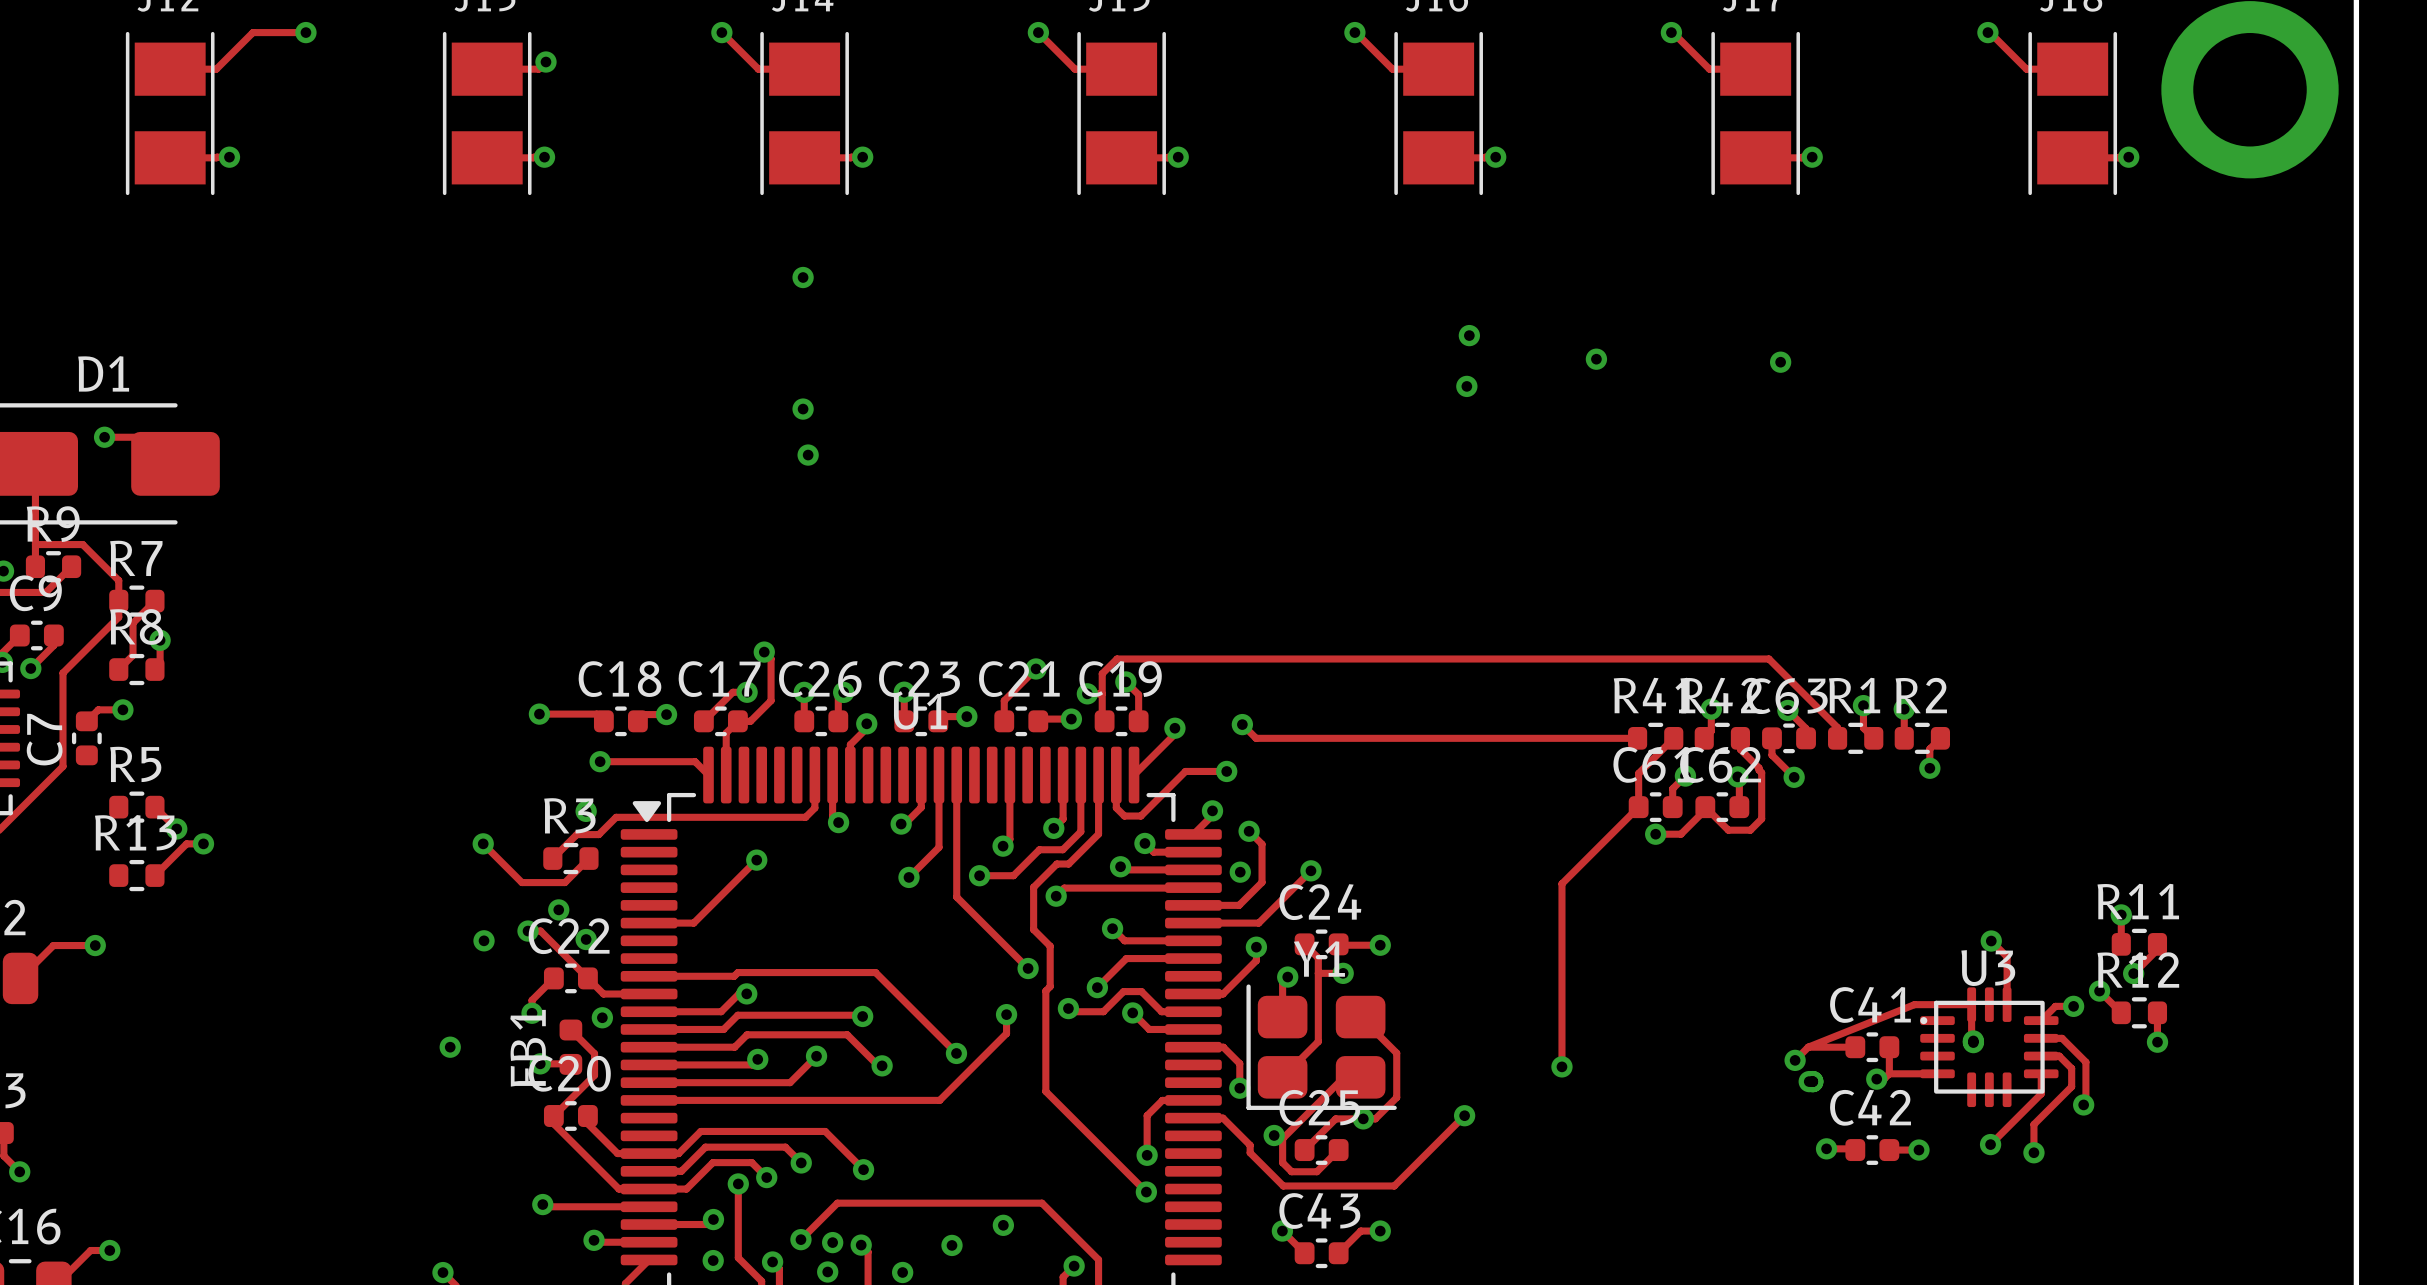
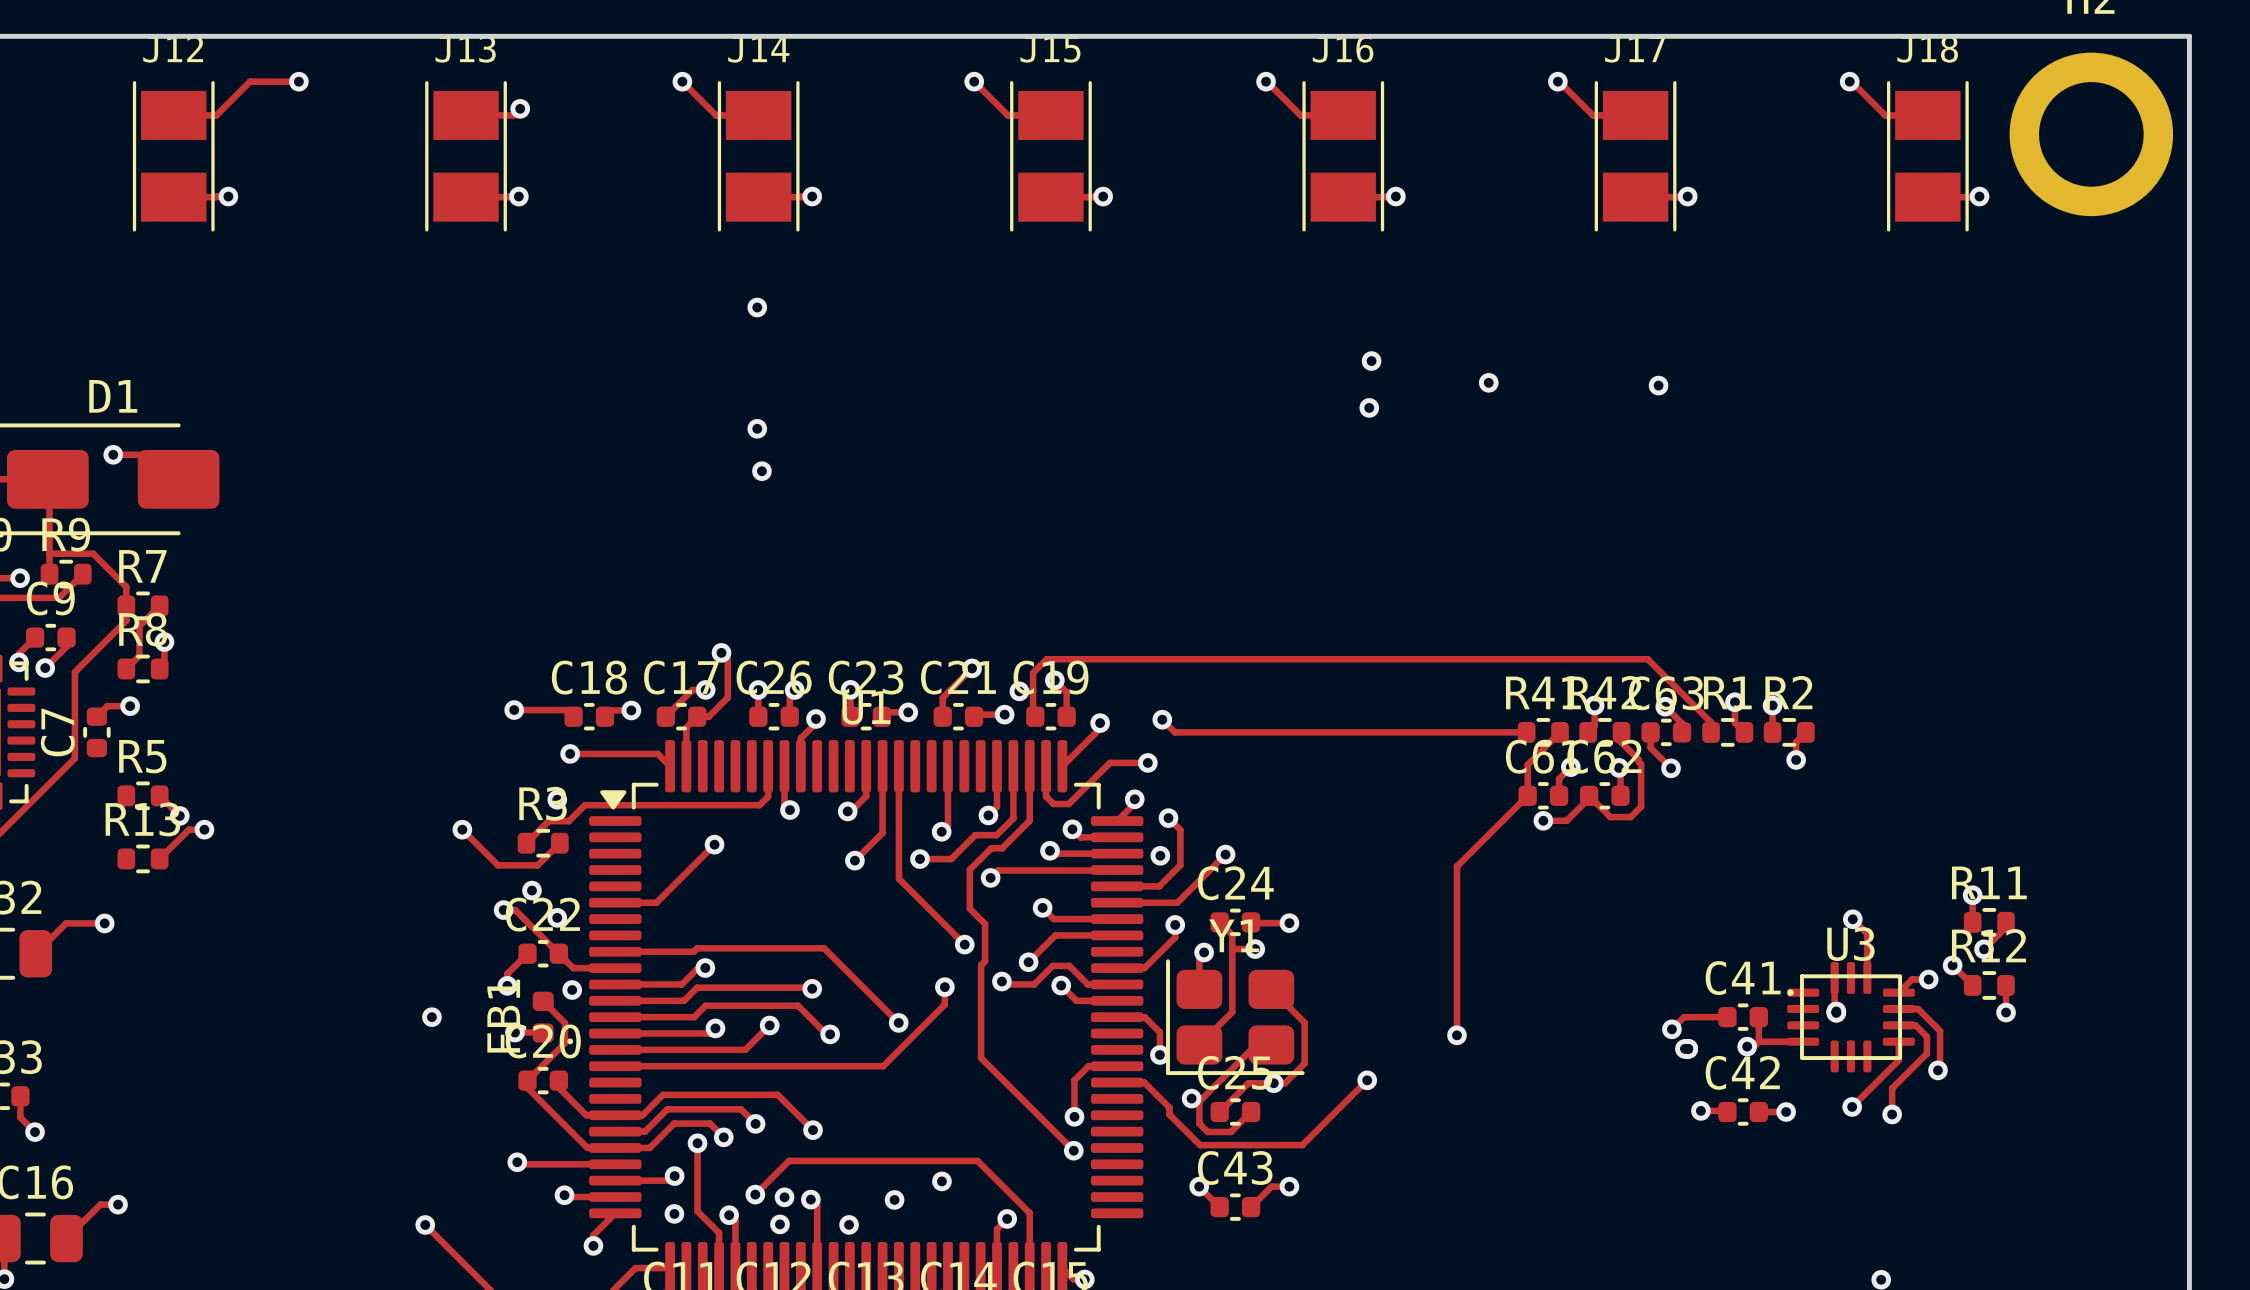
via: (484, 940) -> none
track: (1971, 1004) (1914, 1004) (1808, 1047) -> none

